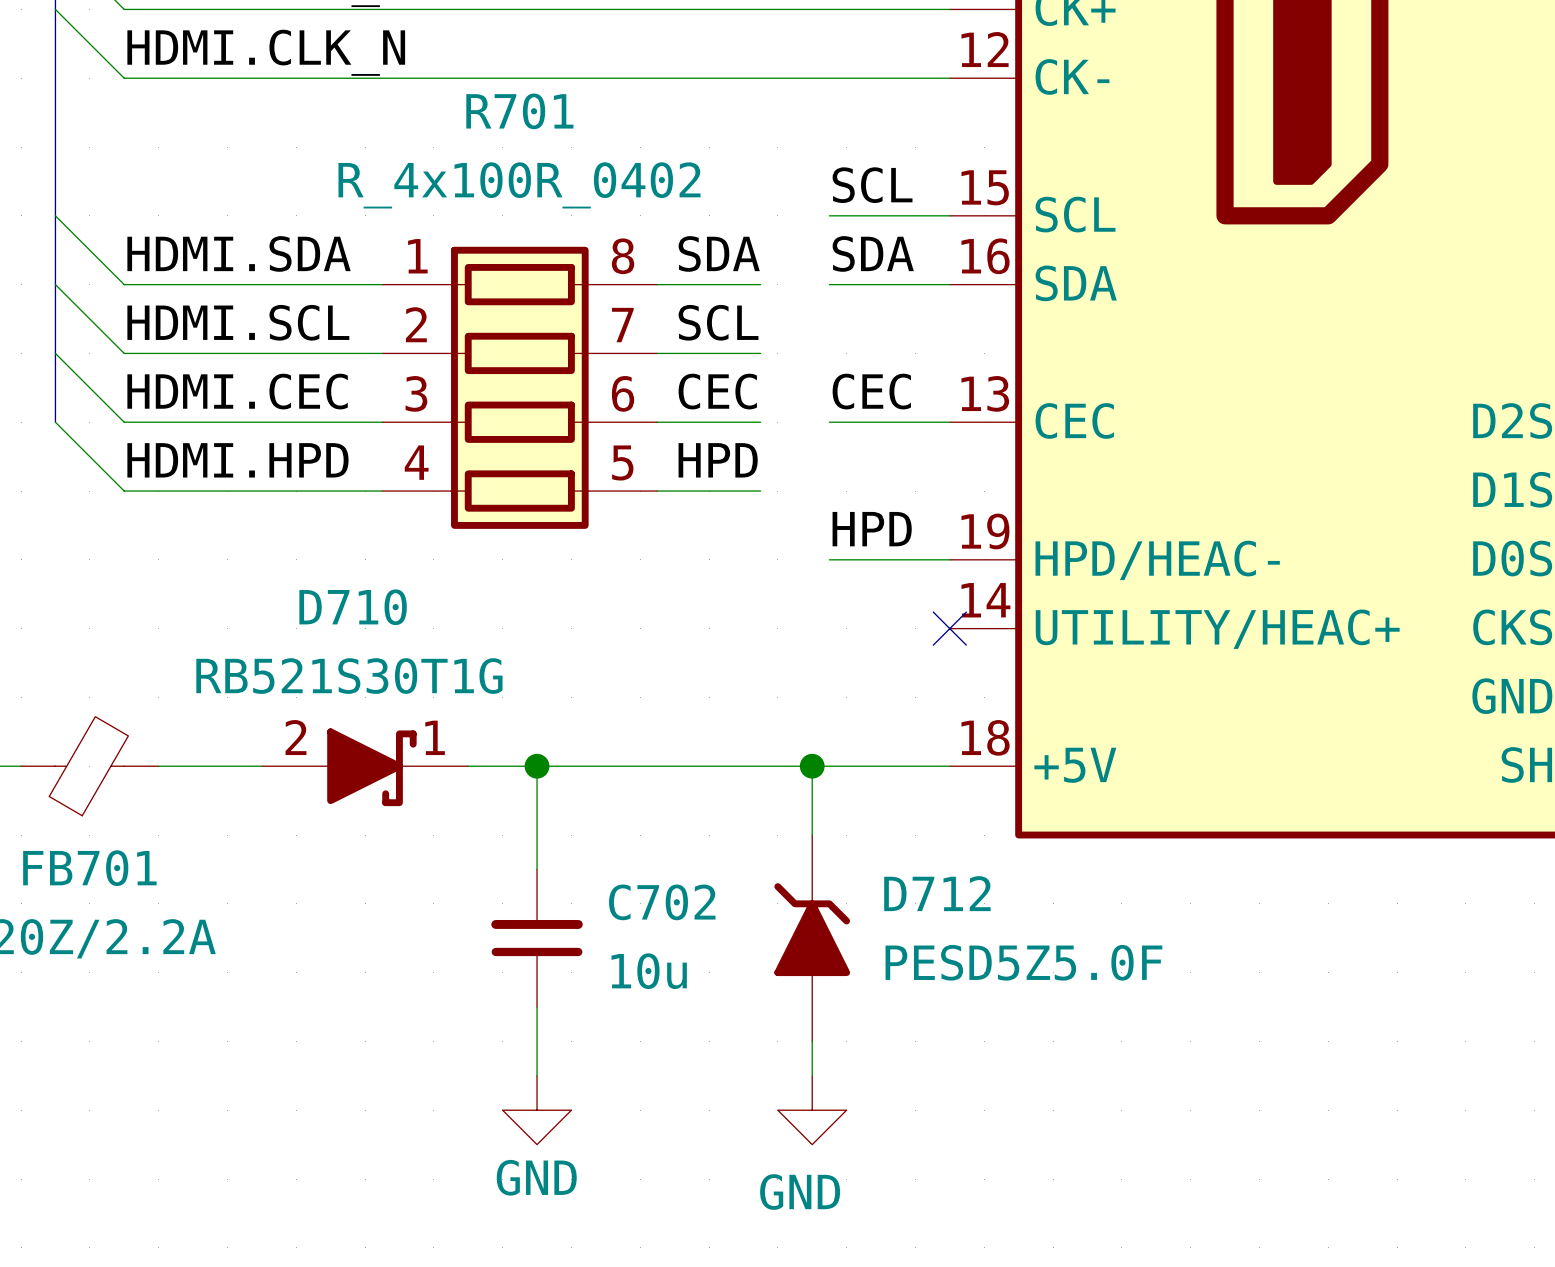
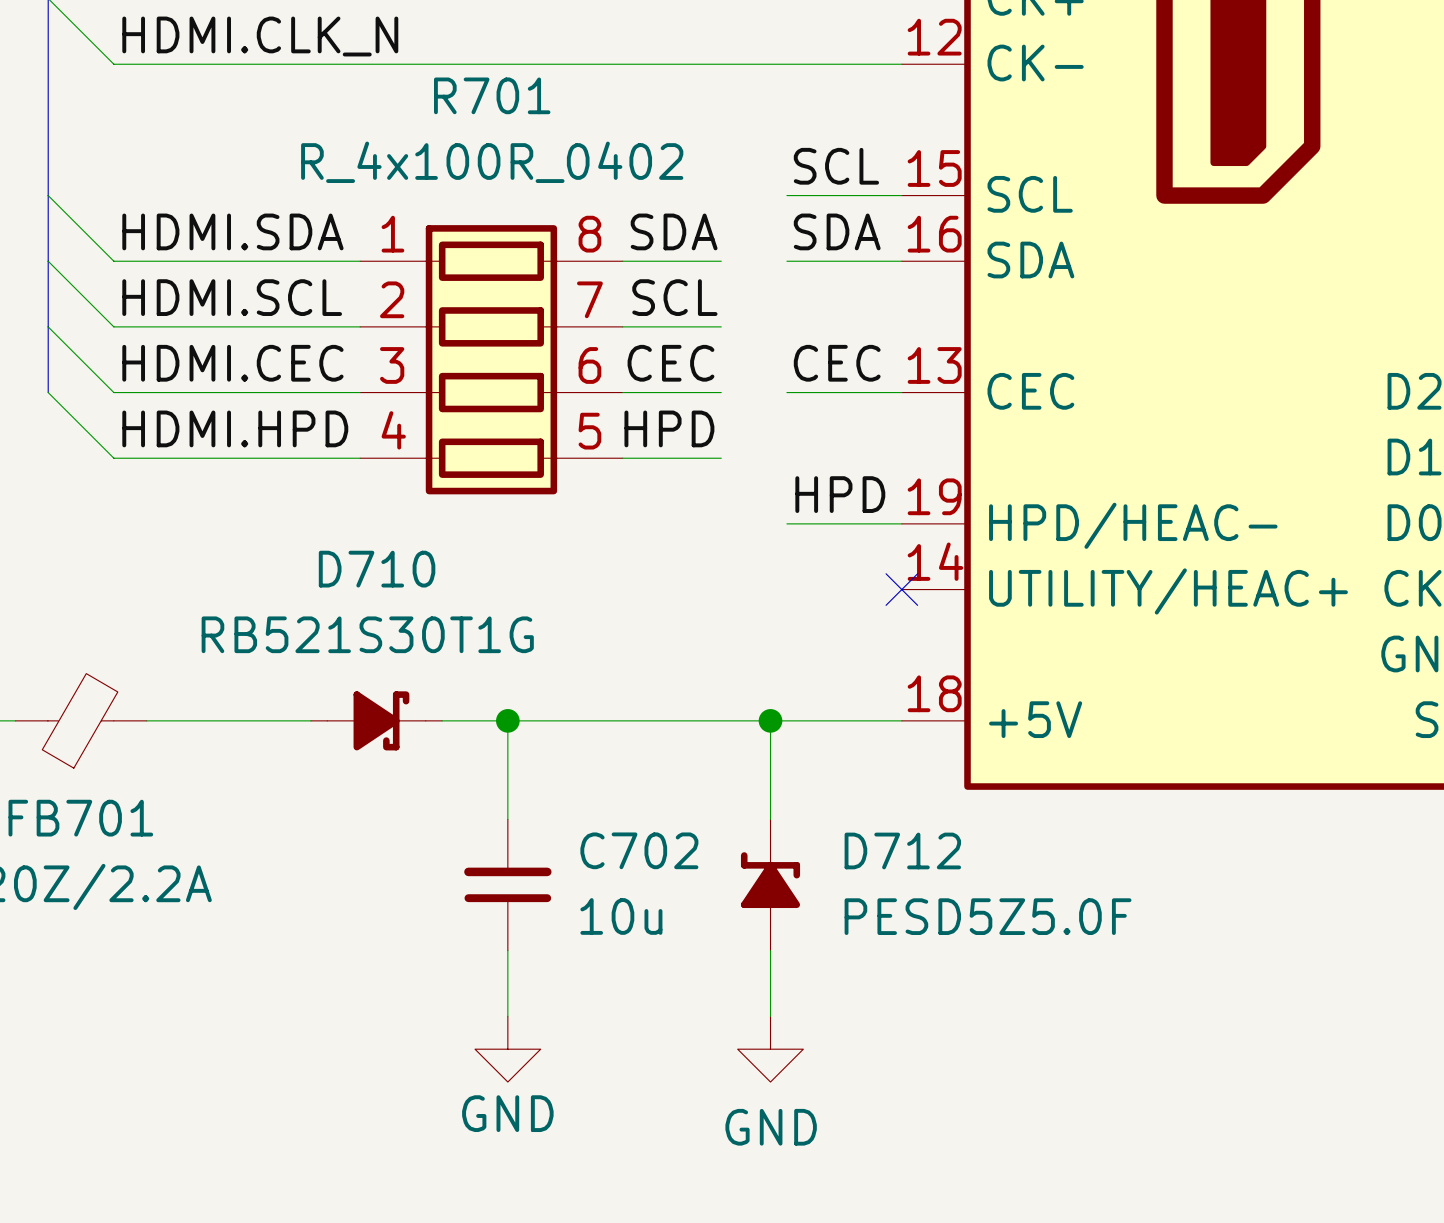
D710 text position: RB521S30T1G (349, 676) -> RB521S30T1G (367, 634)
D710 symbol: [261, 728, 469, 807] -> [310, 691, 443, 751]
D712 symbol: [774, 835, 851, 1042] -> [740, 819, 801, 951]

